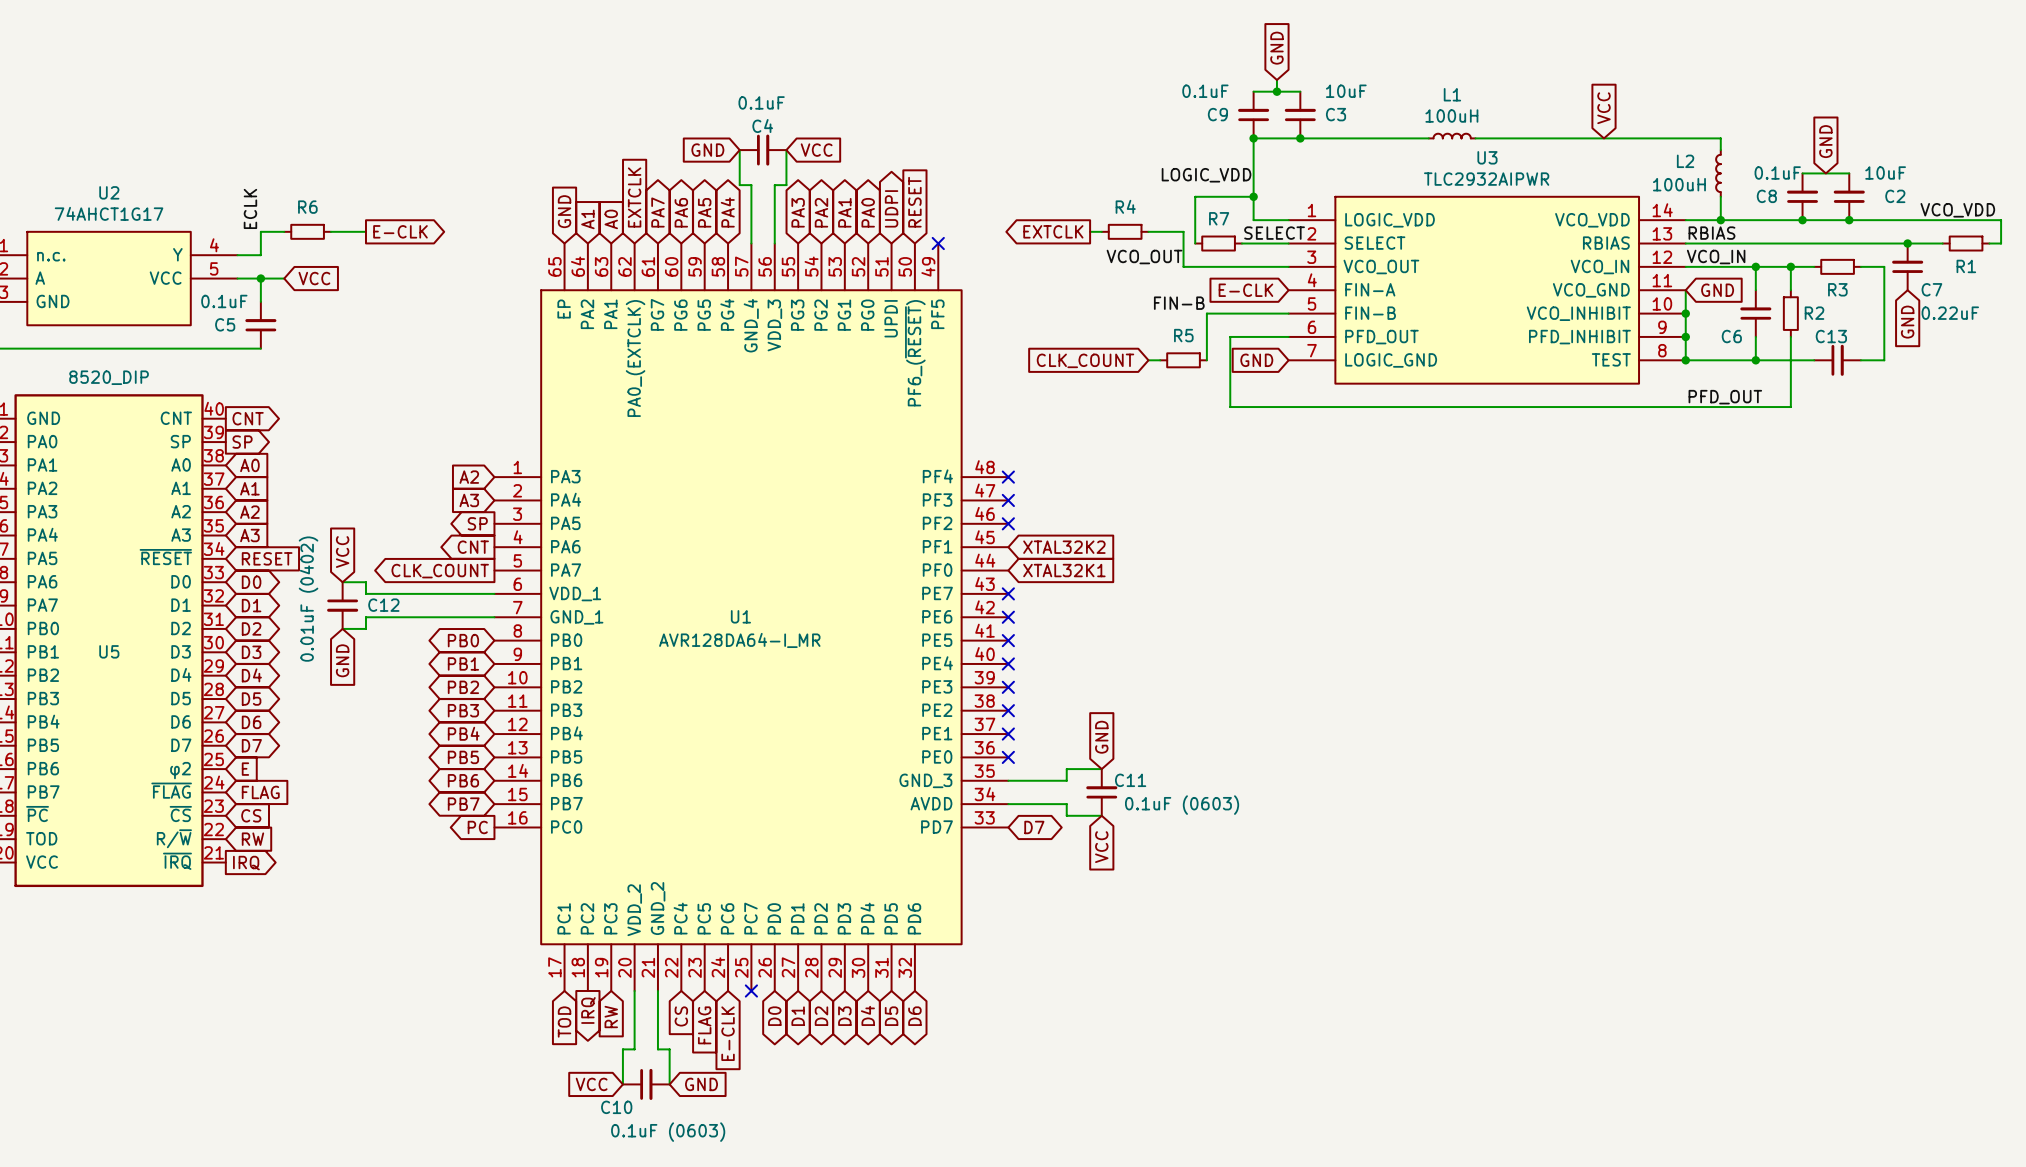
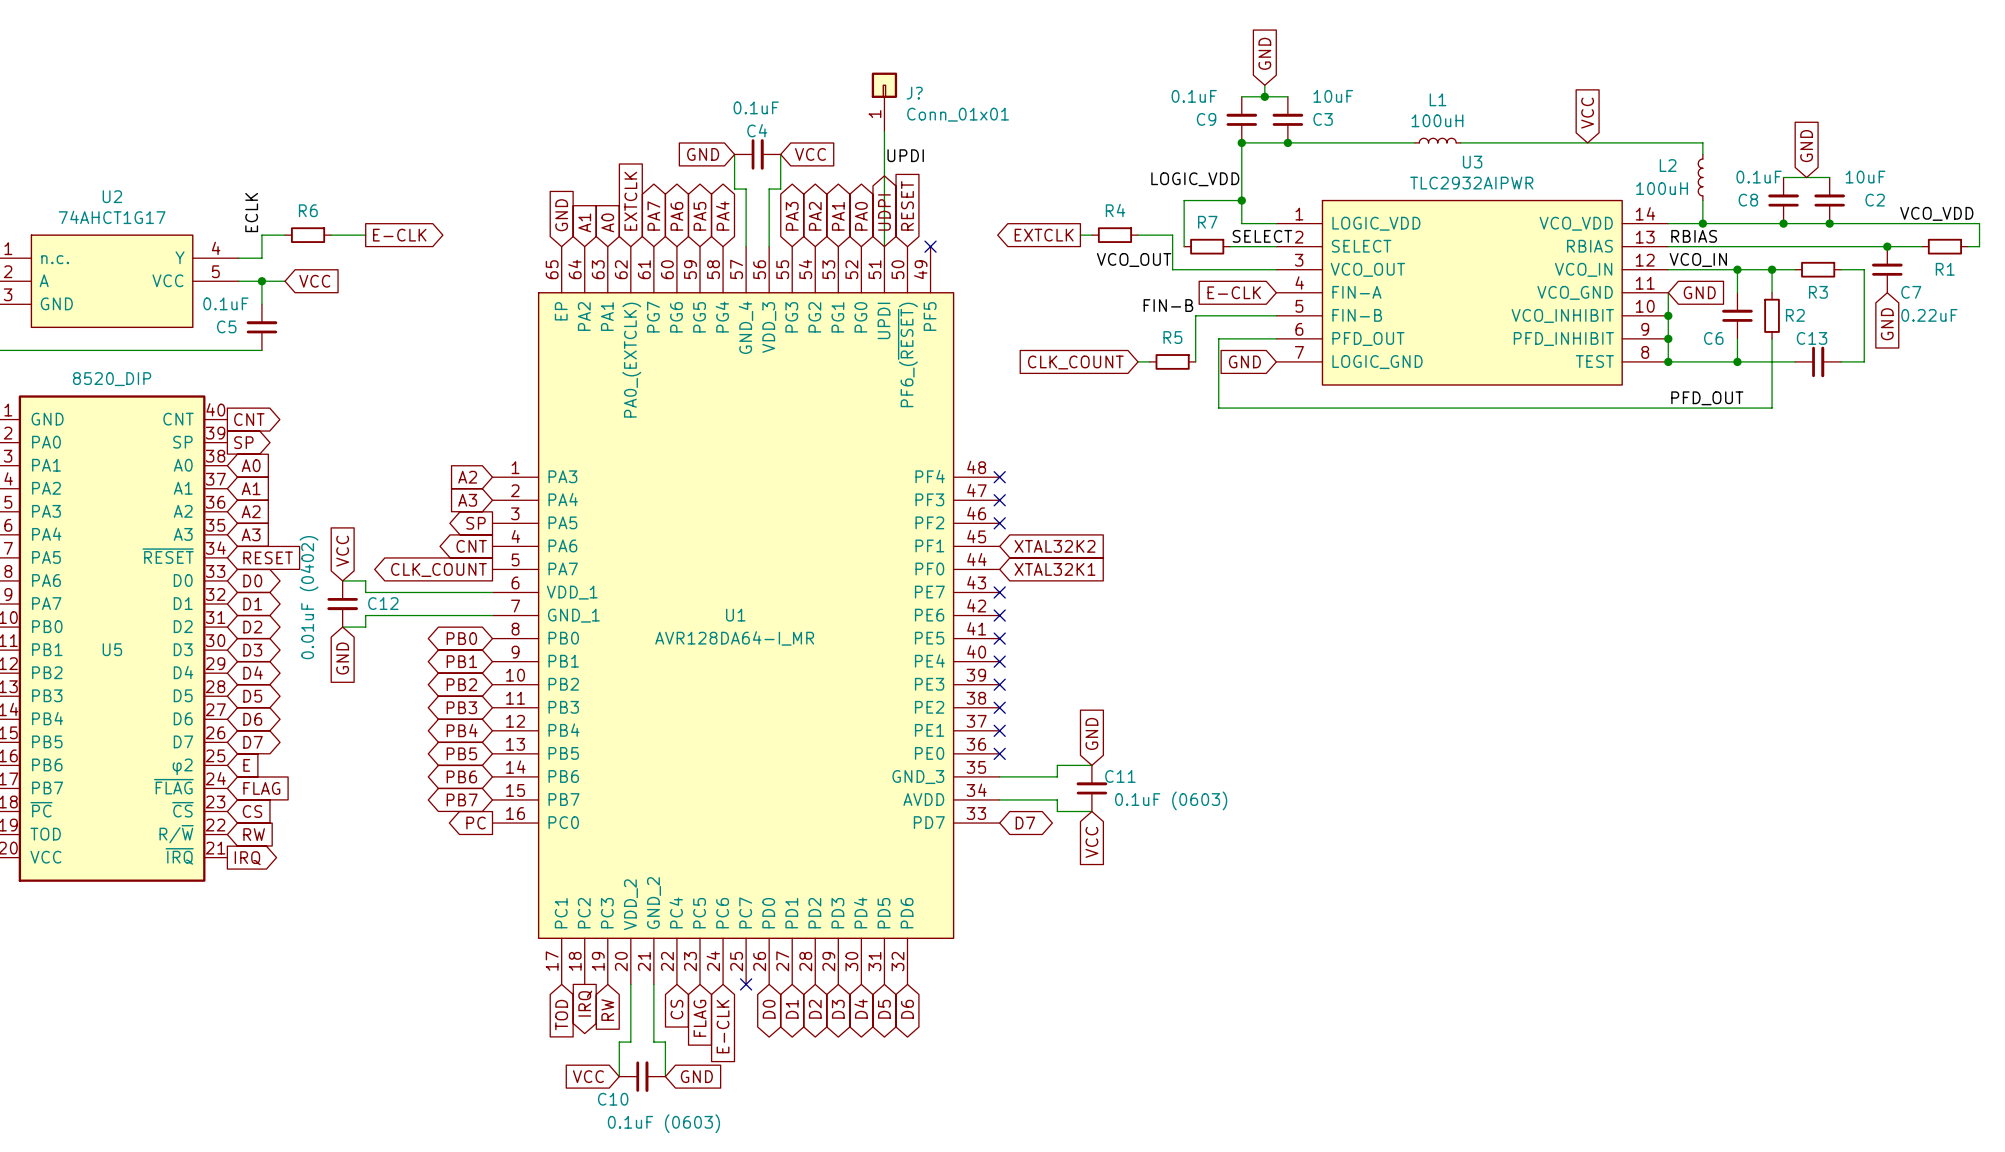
J?: none -> Conn_01x01 (884, 101)
wire: none -> (884, 131) (884, 246)
label: none -> UPDI (905, 155)

